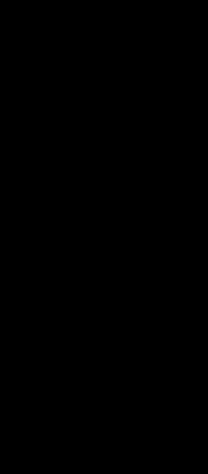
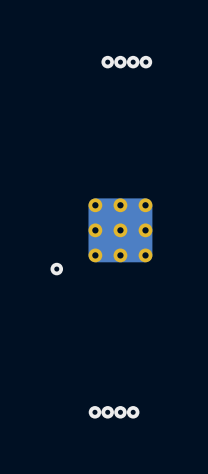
via: none -> (107, 62)
via: none -> (120, 62)
via: none -> (133, 62)
via: none -> (145, 62)
part: none -> (120, 230)
via: none -> (56, 269)
via: none -> (94, 412)
via: none -> (107, 412)
via: none -> (120, 412)
via: none -> (133, 412)

